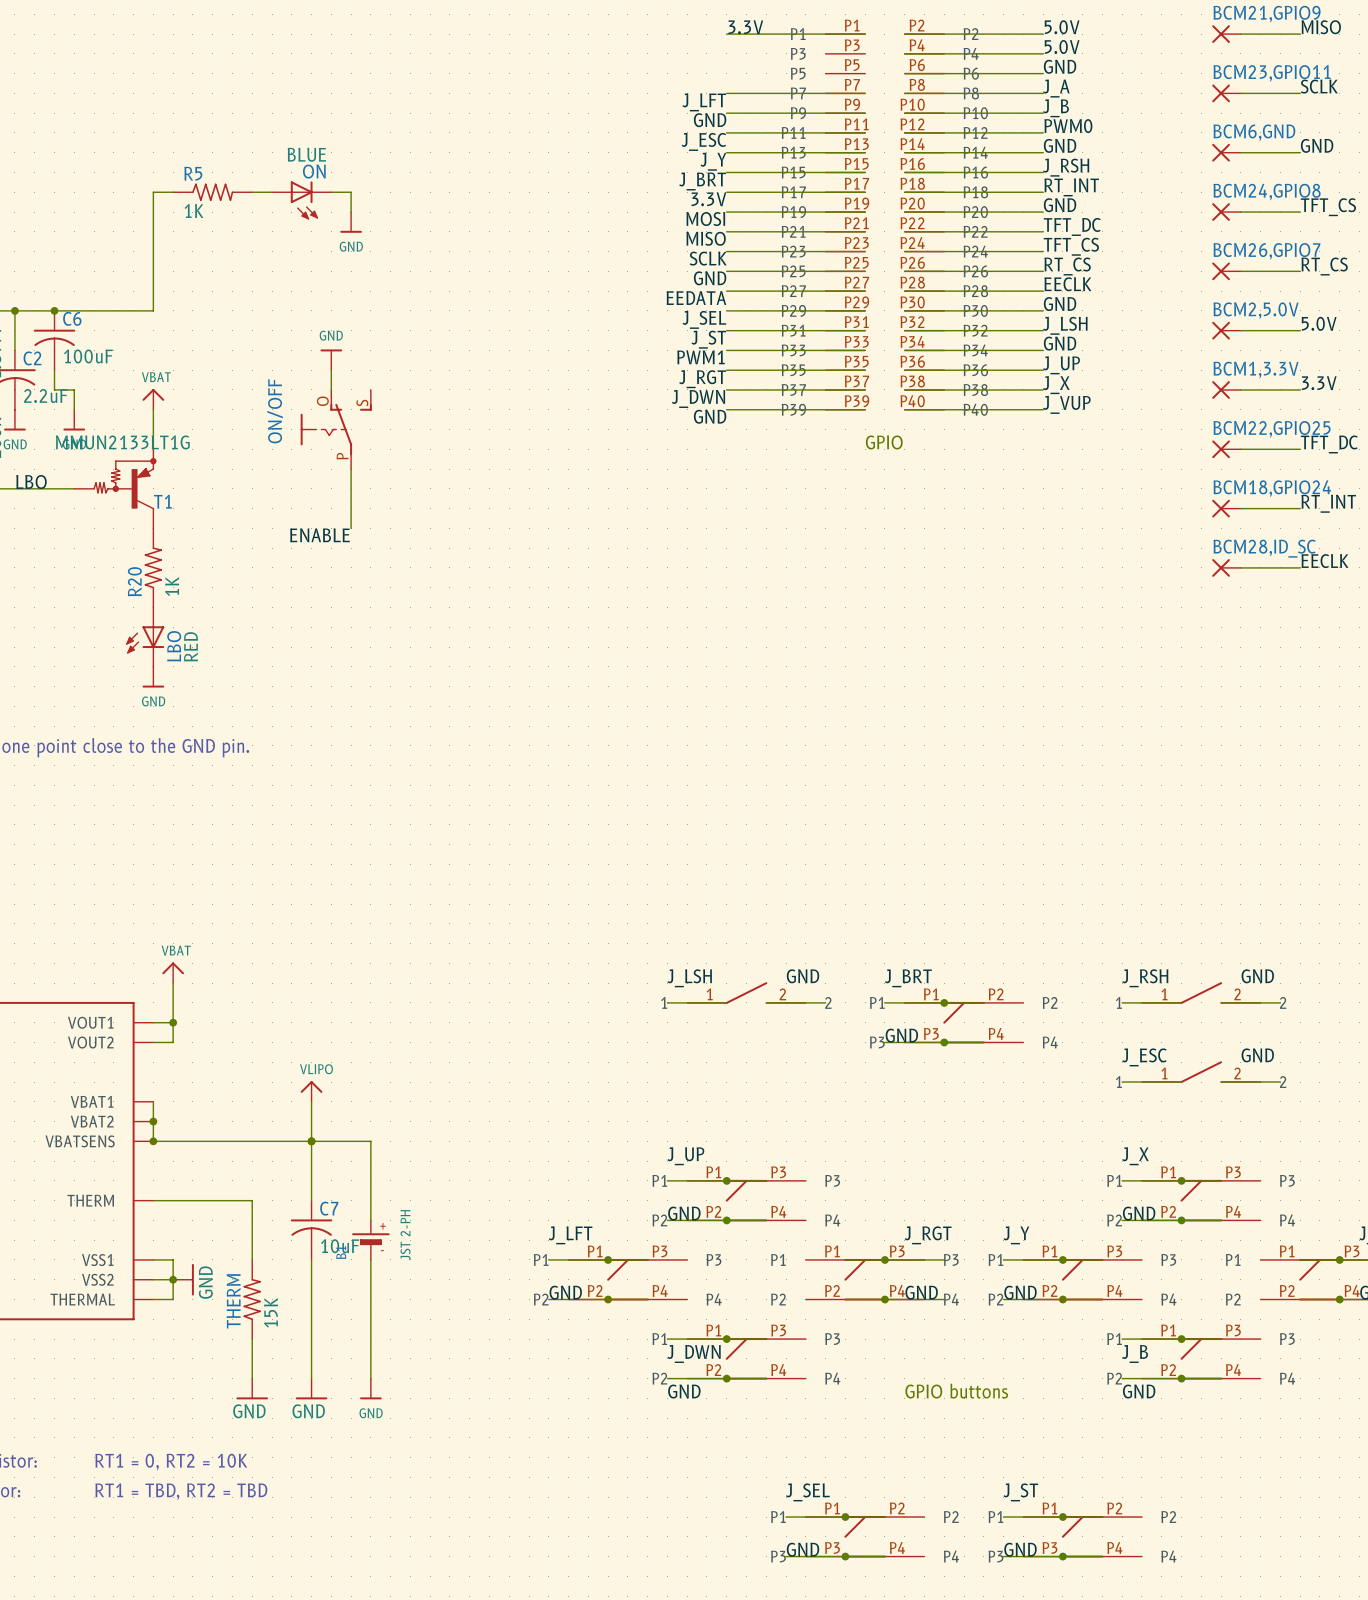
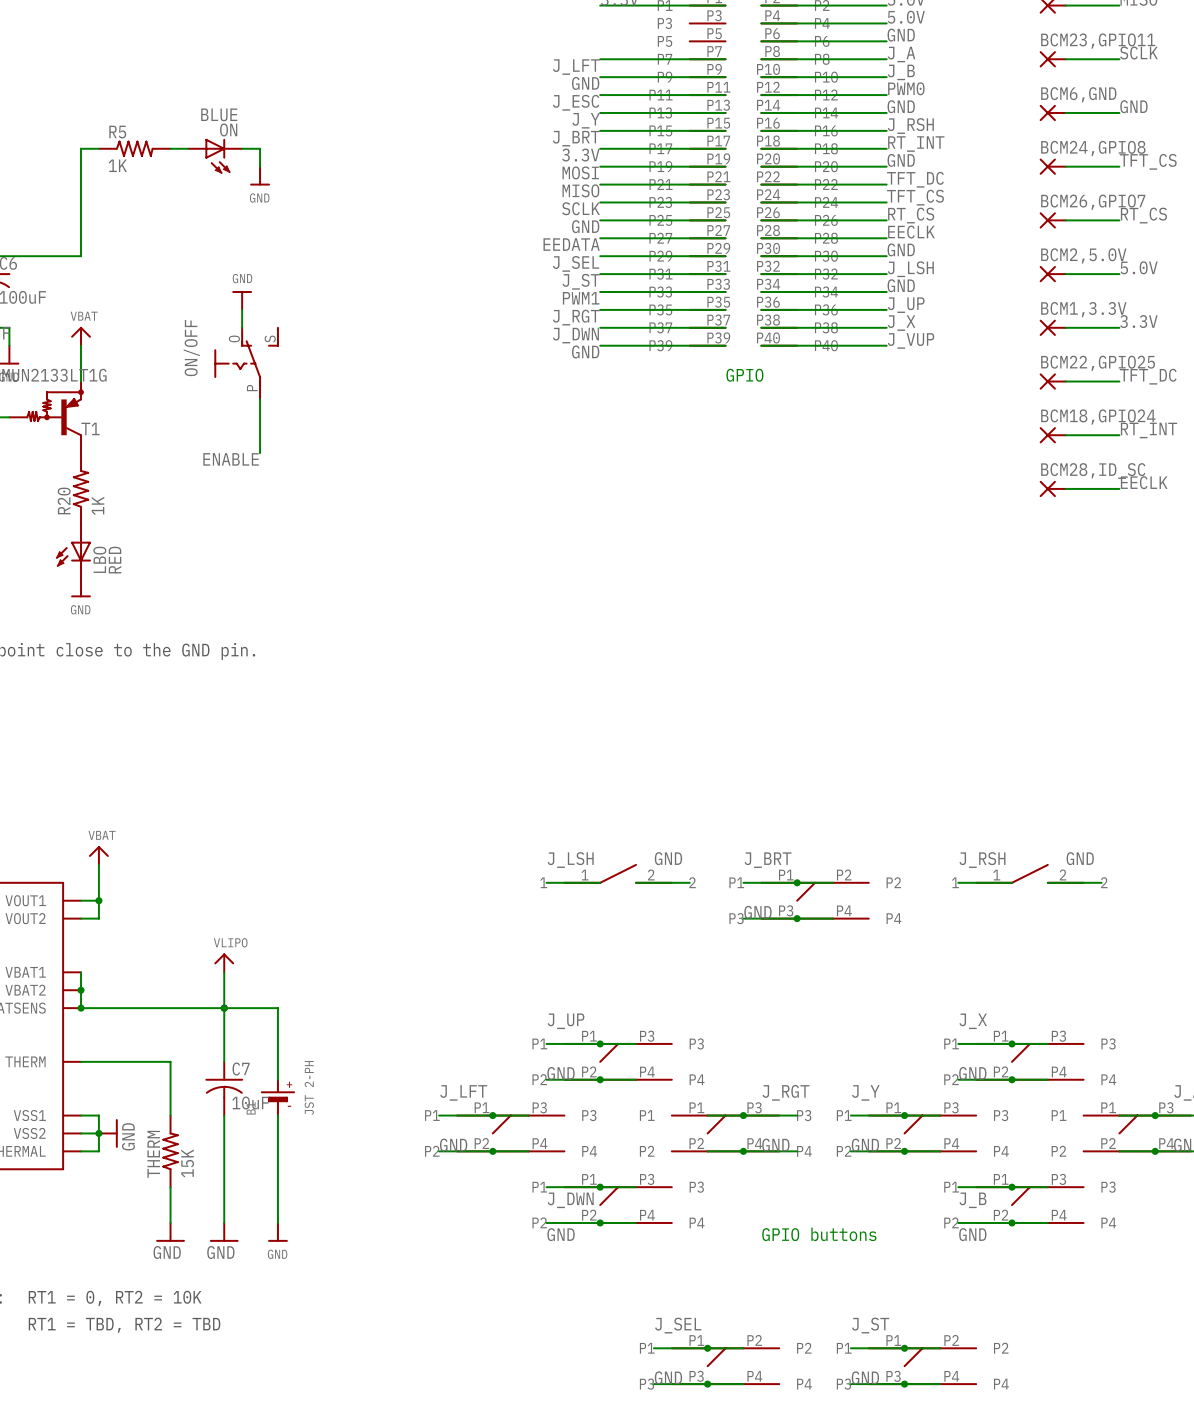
label: GND (1257, 1055) -> none
label: J_ESC (1144, 1057) -> none
part: (1201, 1072) -> none
wire: (1122, 1082) (1181, 1082) -> none
wire: (1221, 1082) (1280, 1082) -> none

